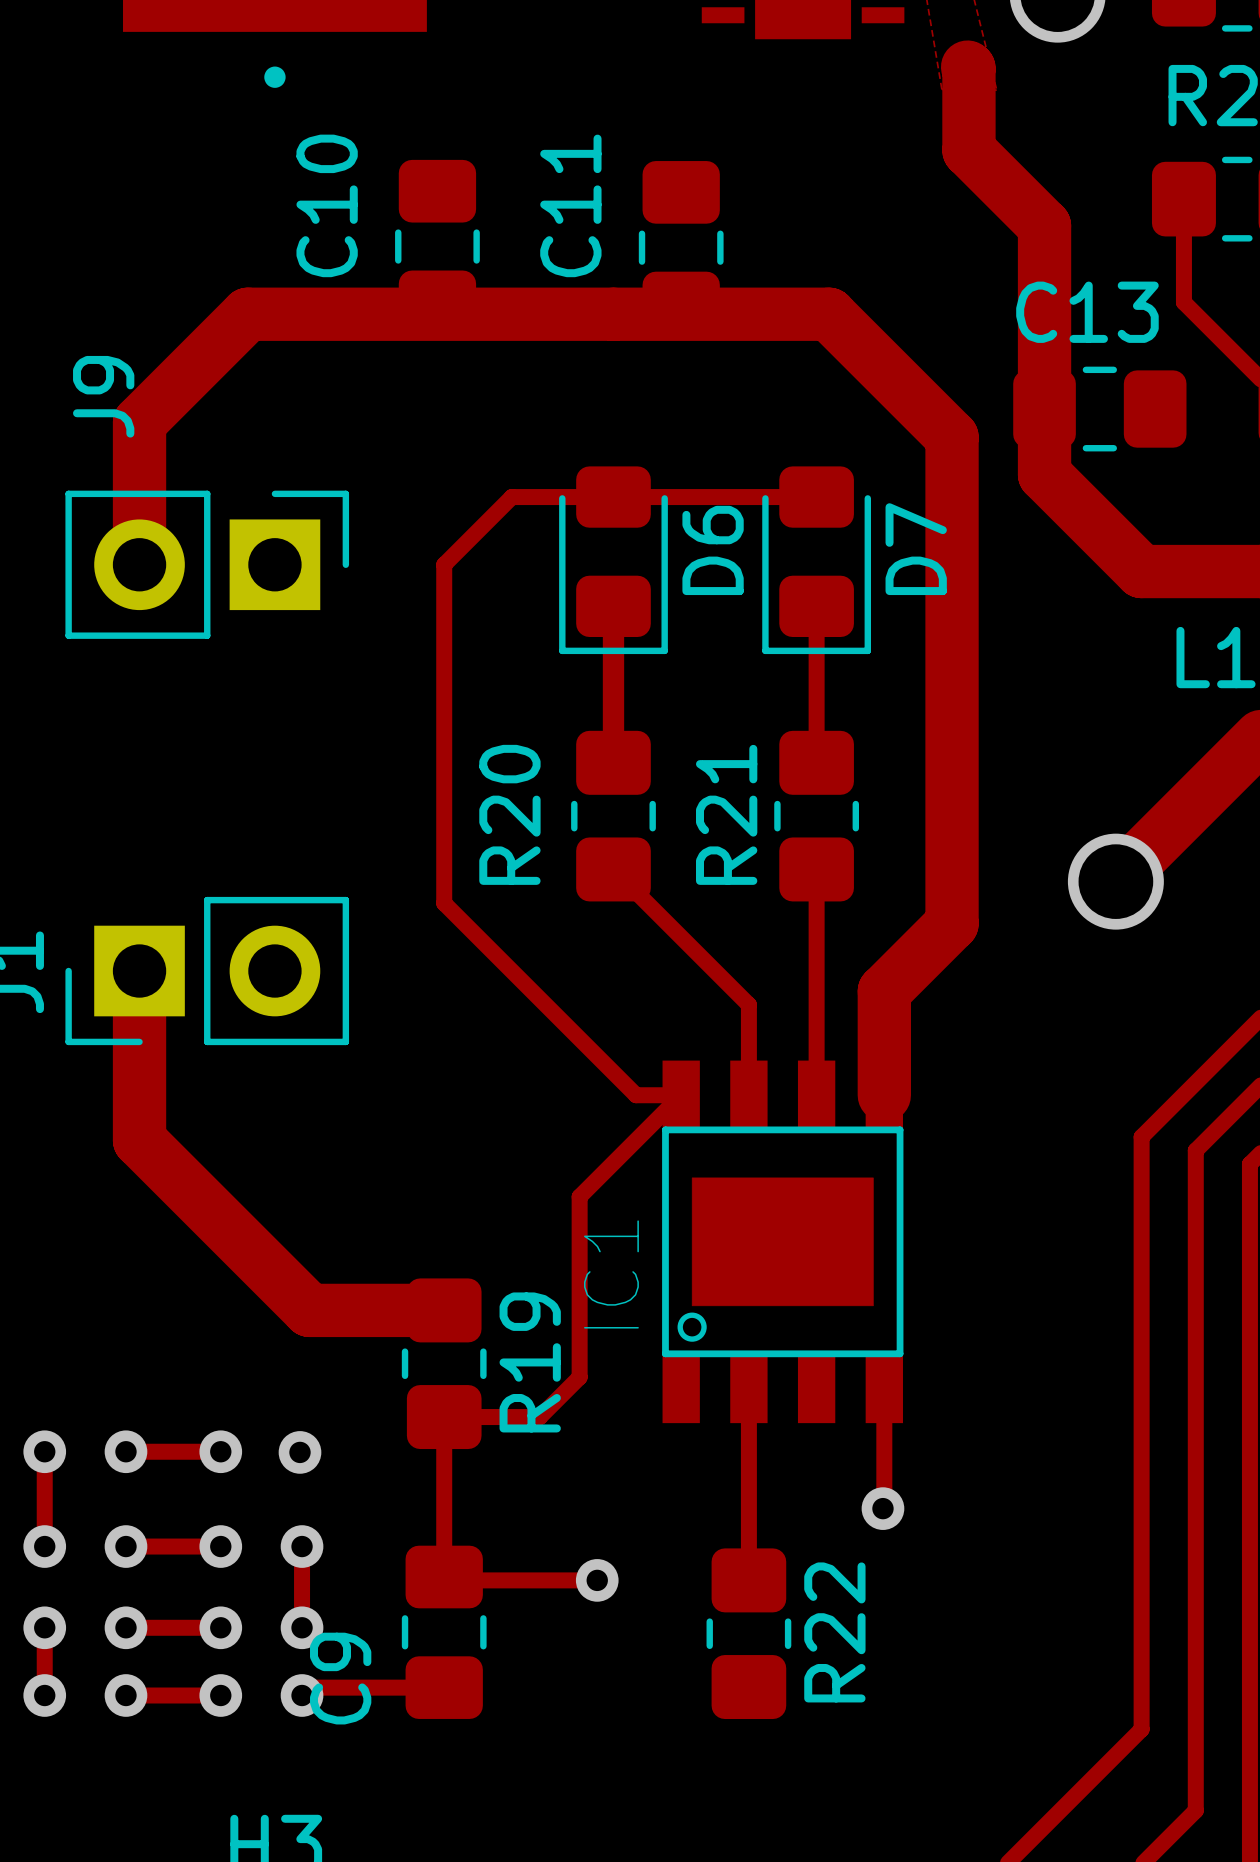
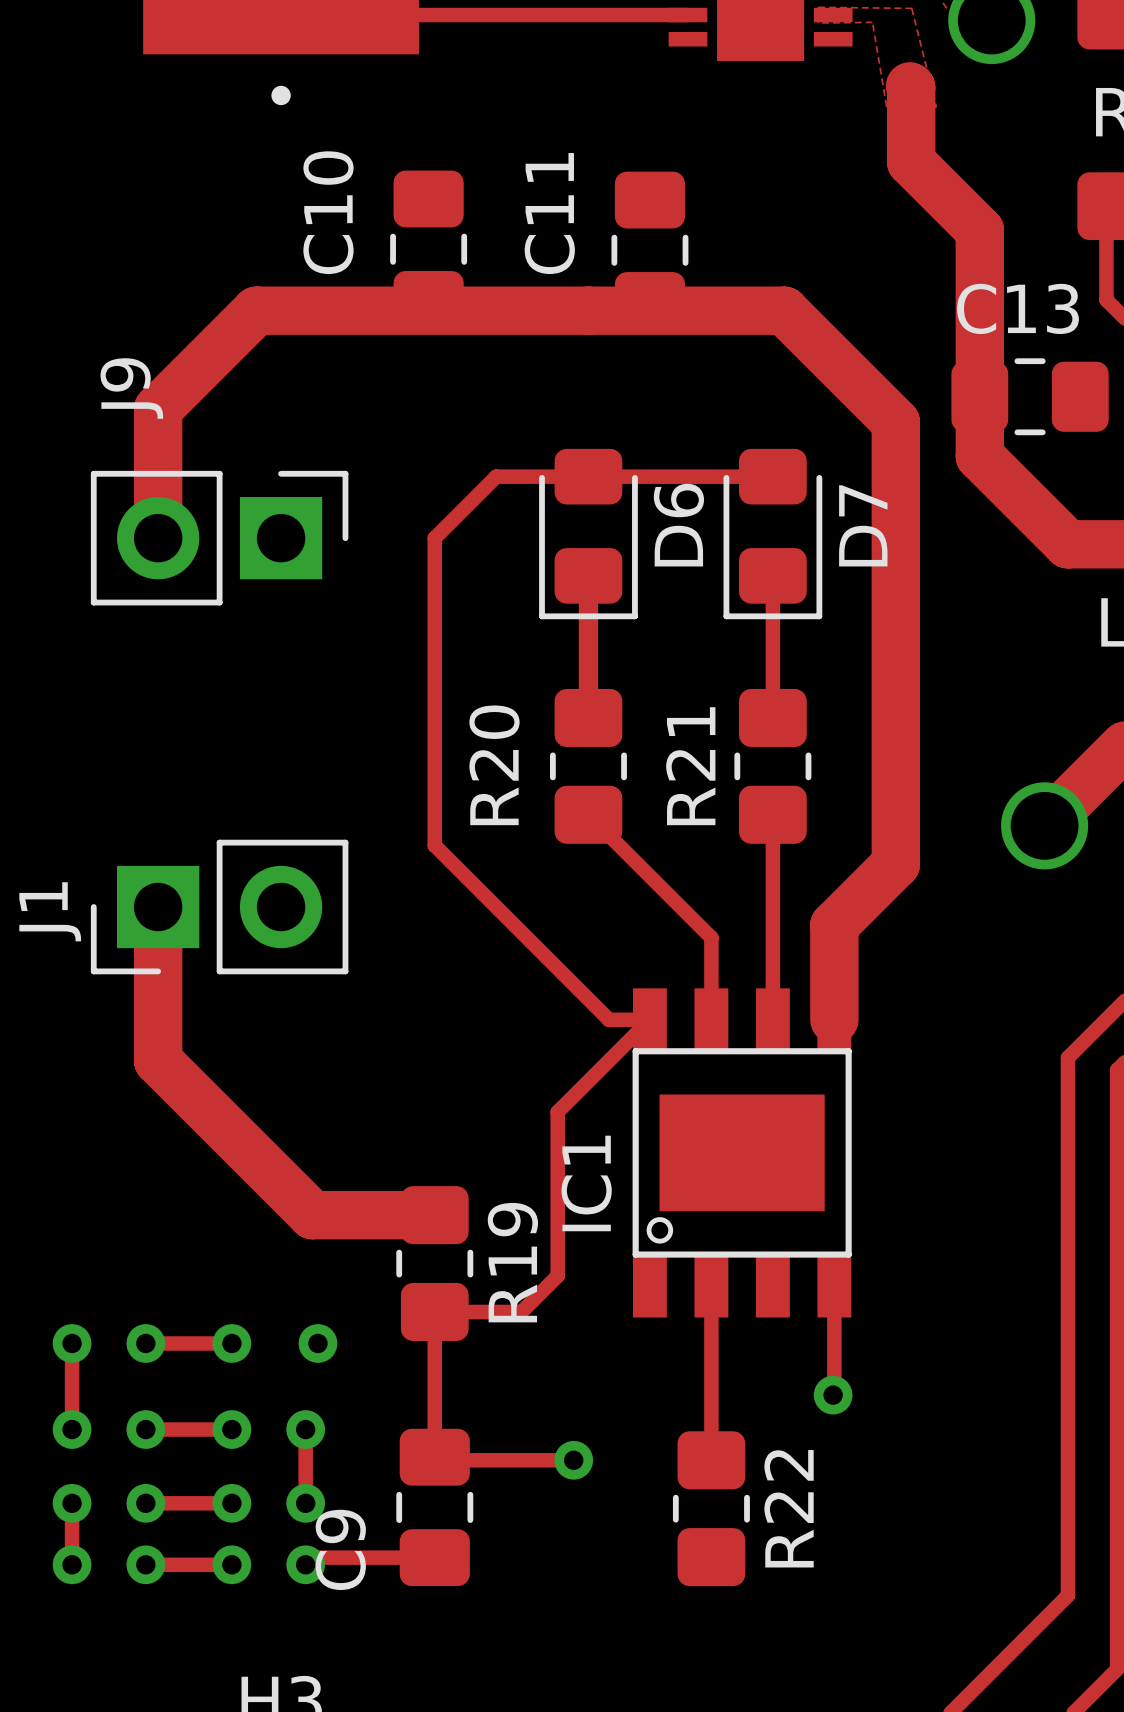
via position: (300, 1452) -> (317, 1343)

